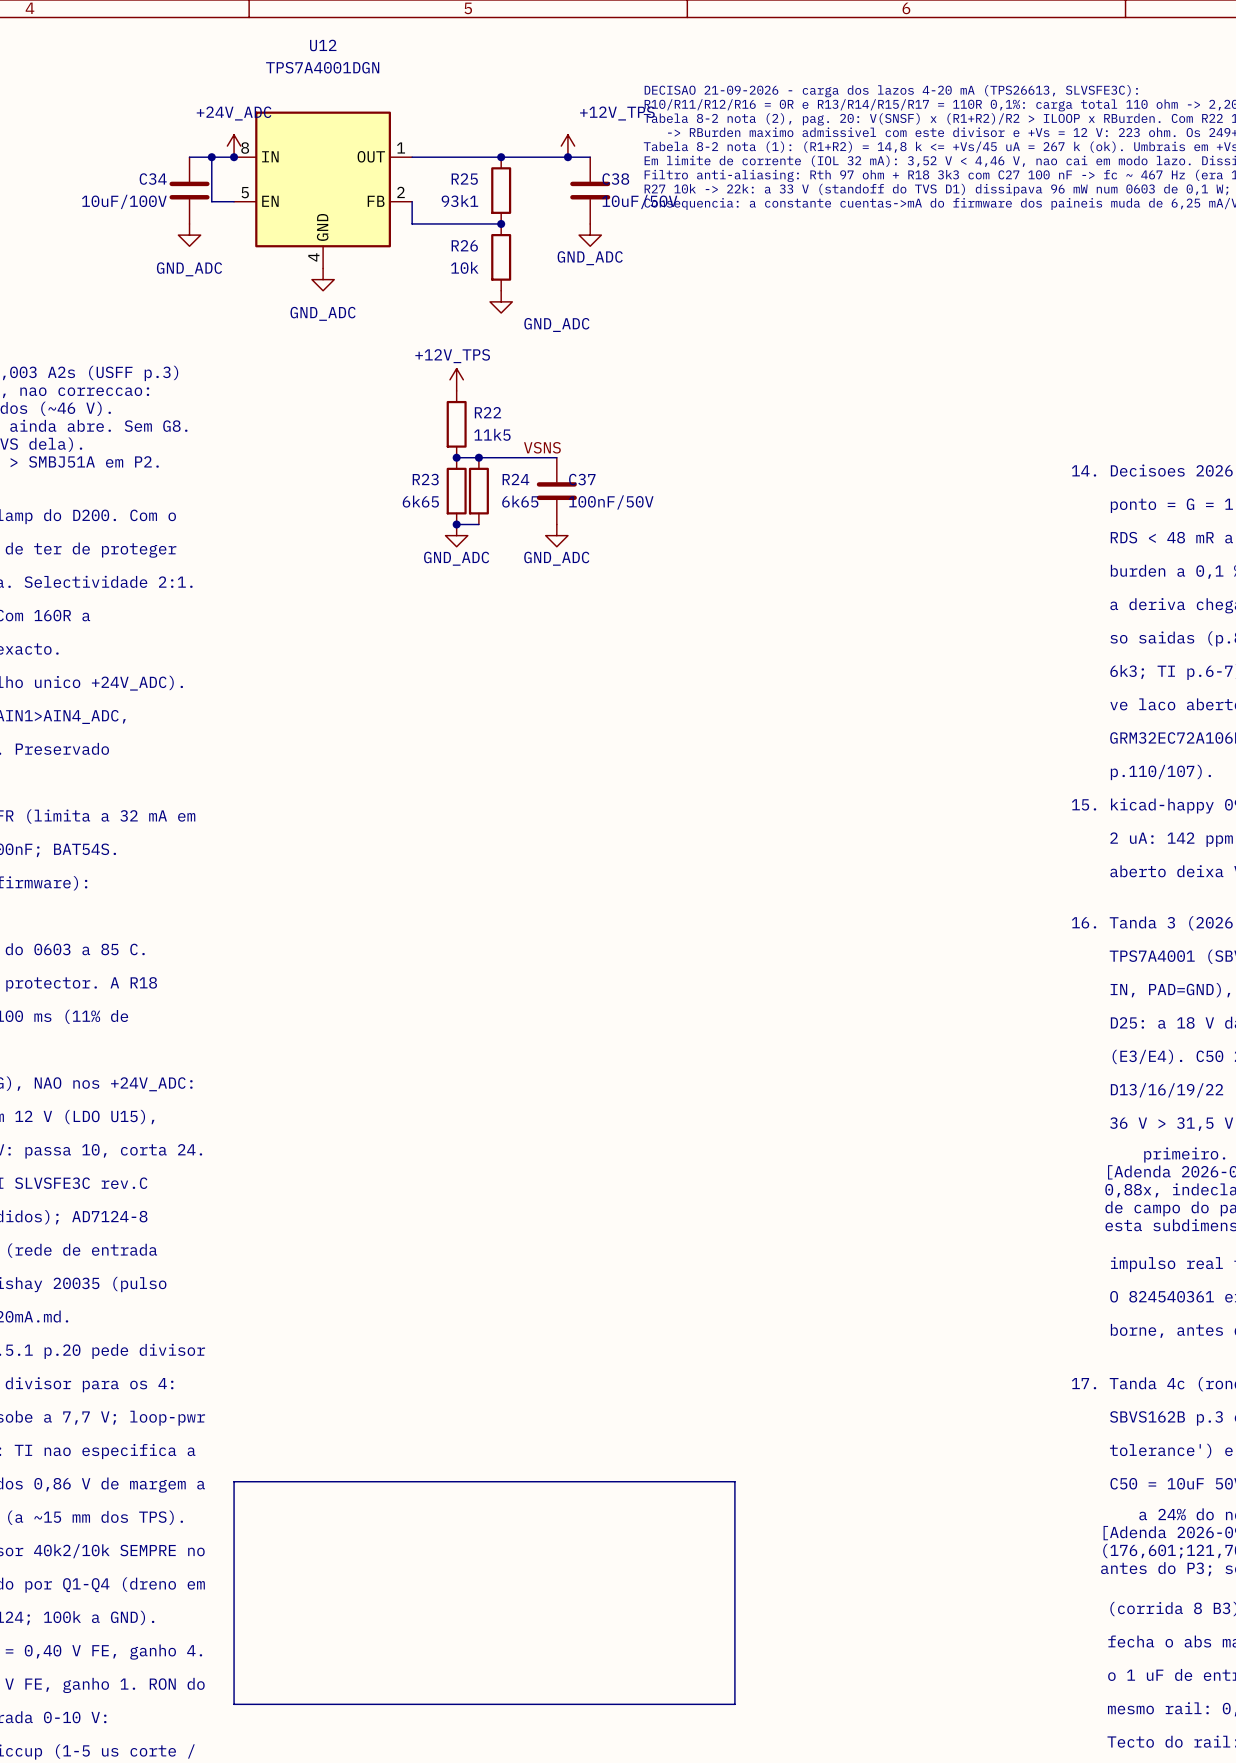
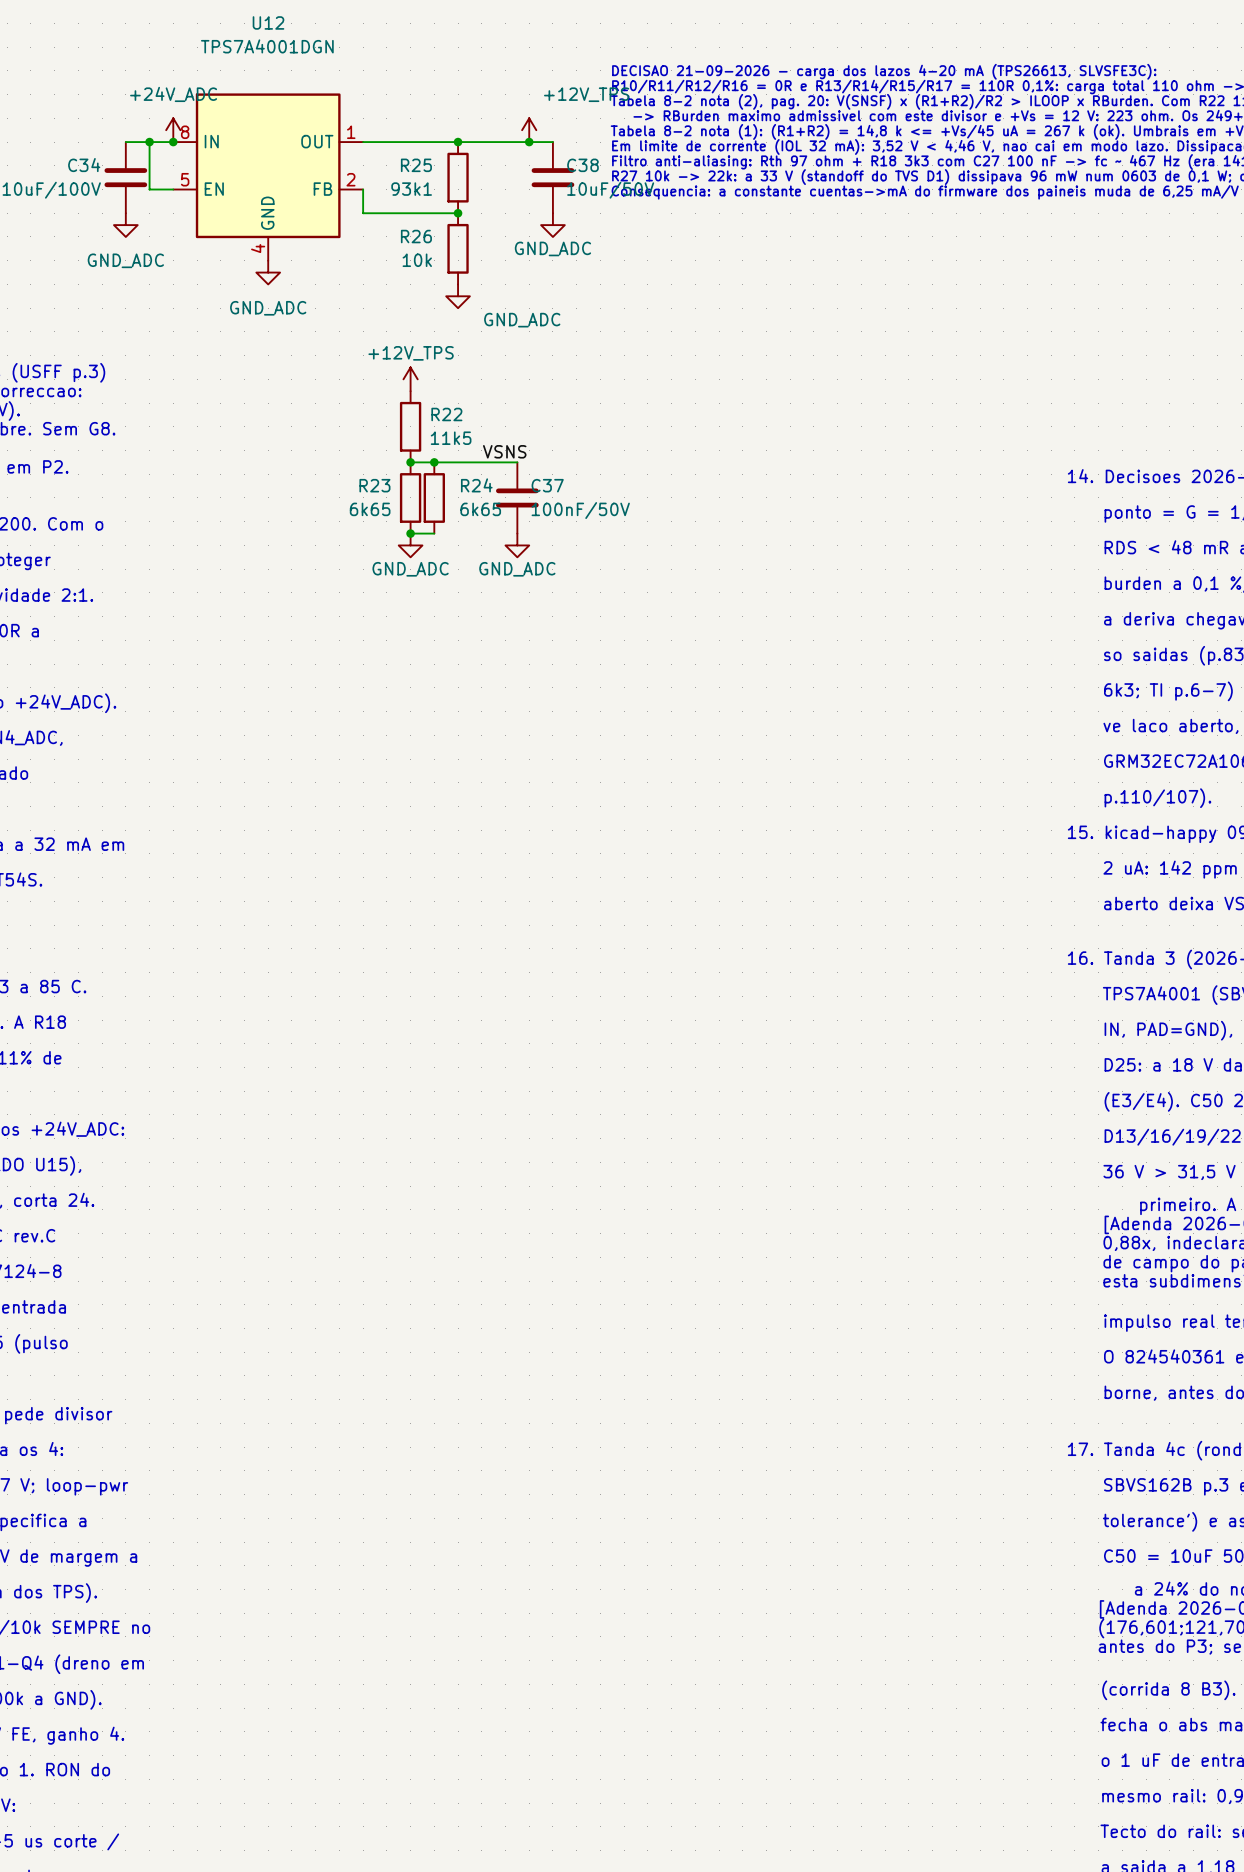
line: (234, 1481) (734, 1481) (734, 1704) (234, 1704) (234, 1481) -> none

